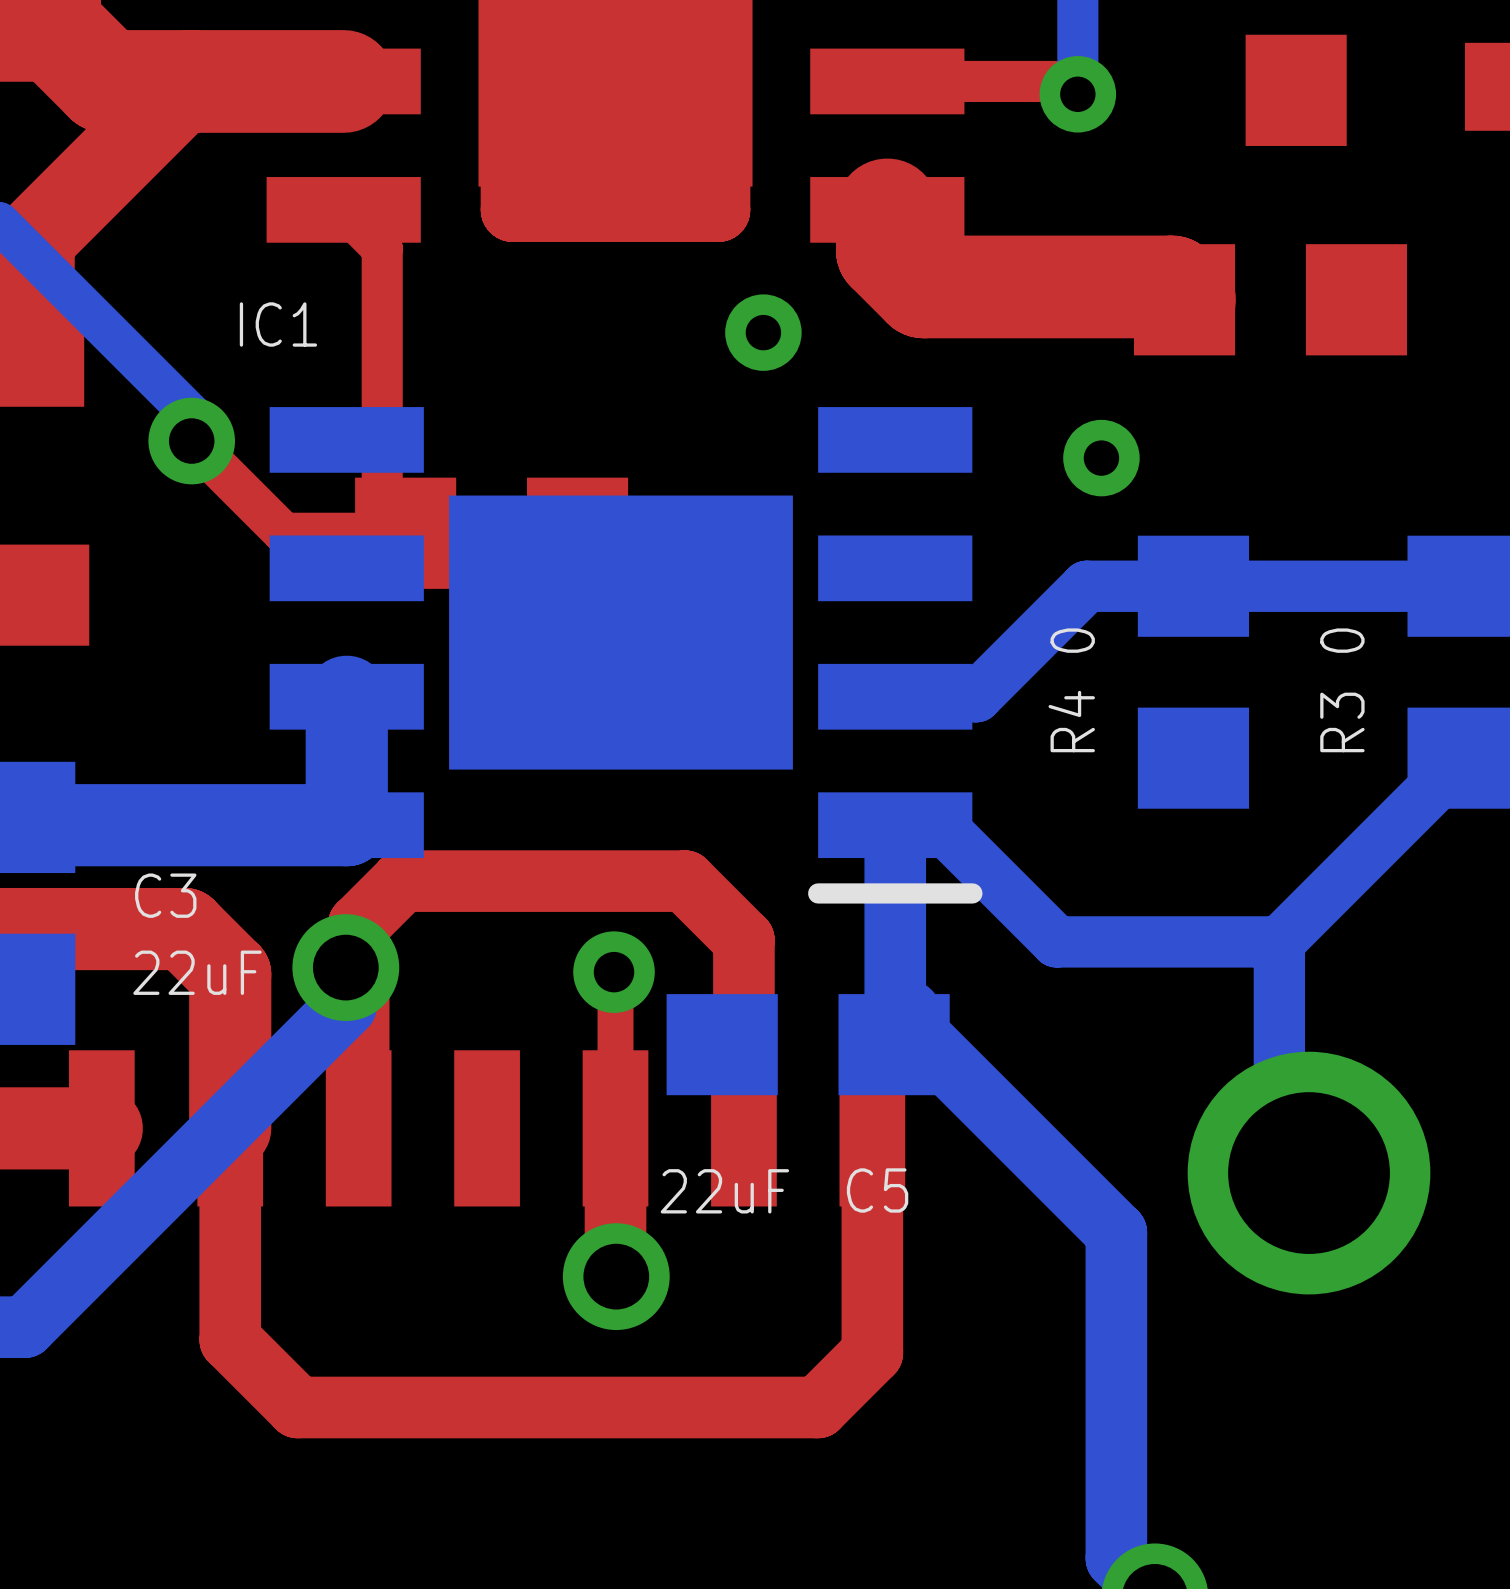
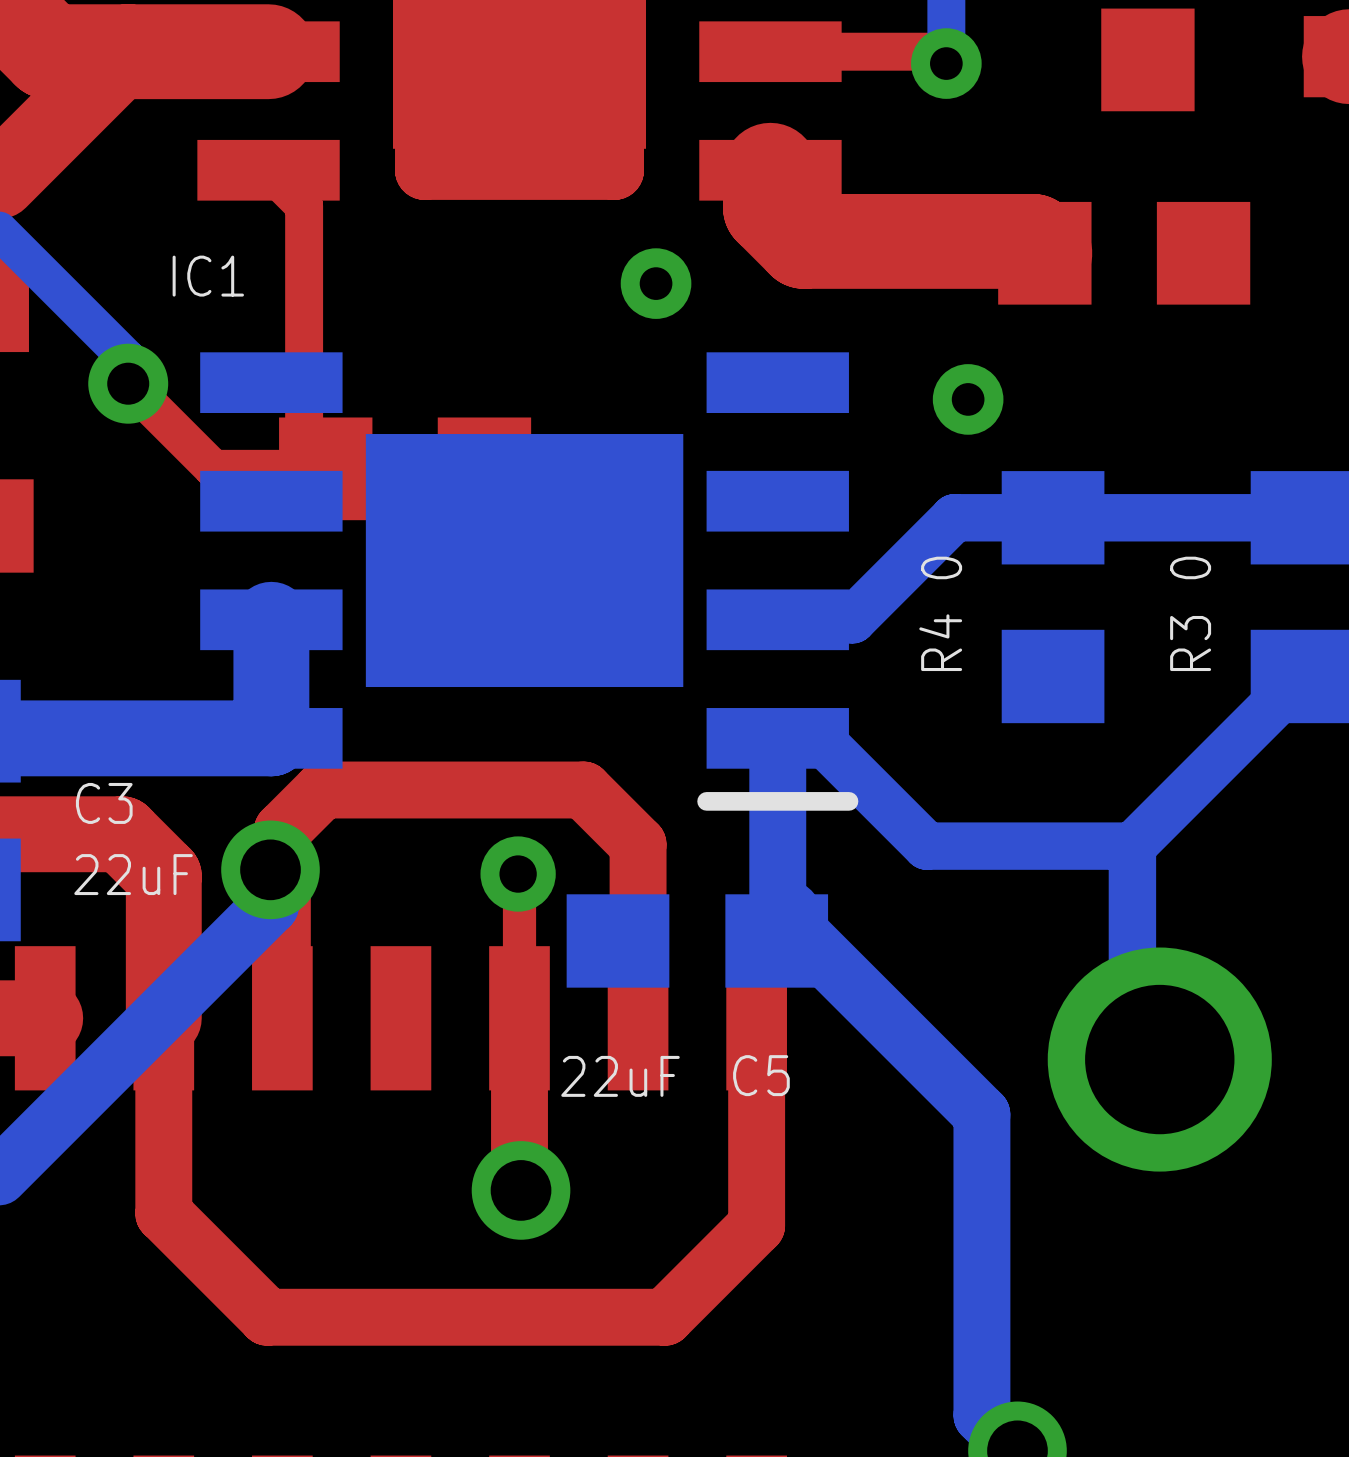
via position: (616, 1276) -> (521, 1190)
top track: (817, 1407) (297, 1407) -> (706, 1275) (664, 1317) (267, 1317) (226, 1275)

